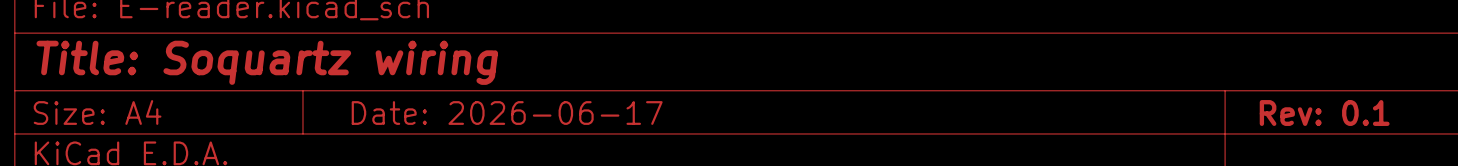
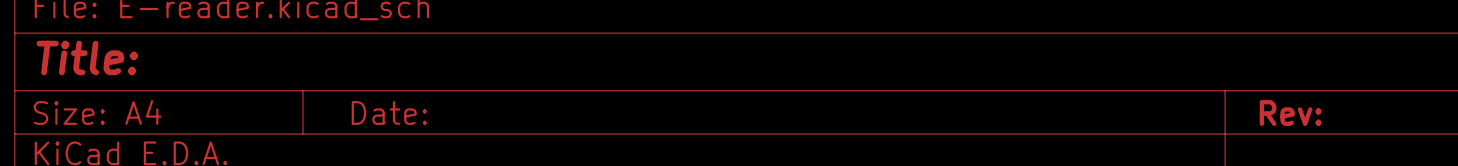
title block: Title: Soquartz wiring (267, 62) -> Title: (87, 57)
title block: Date: 2026-06-17 (507, 113) -> Date: (389, 113)
title block: Rev: 0.1 (1324, 113) -> Rev: (1290, 113)

